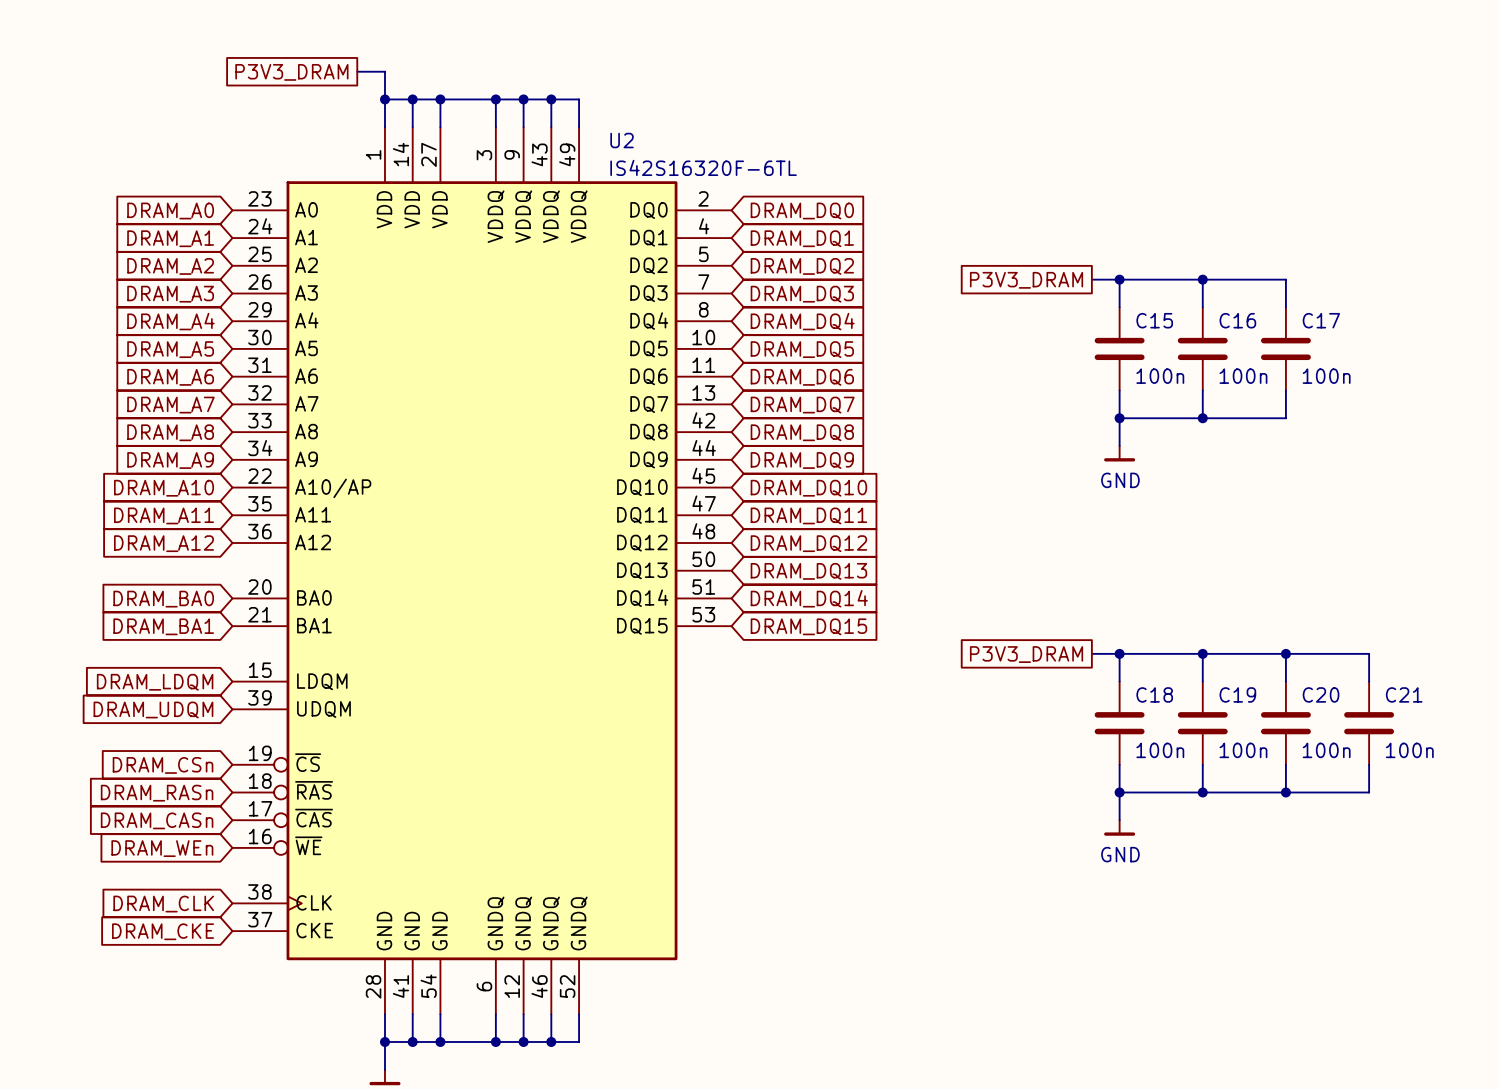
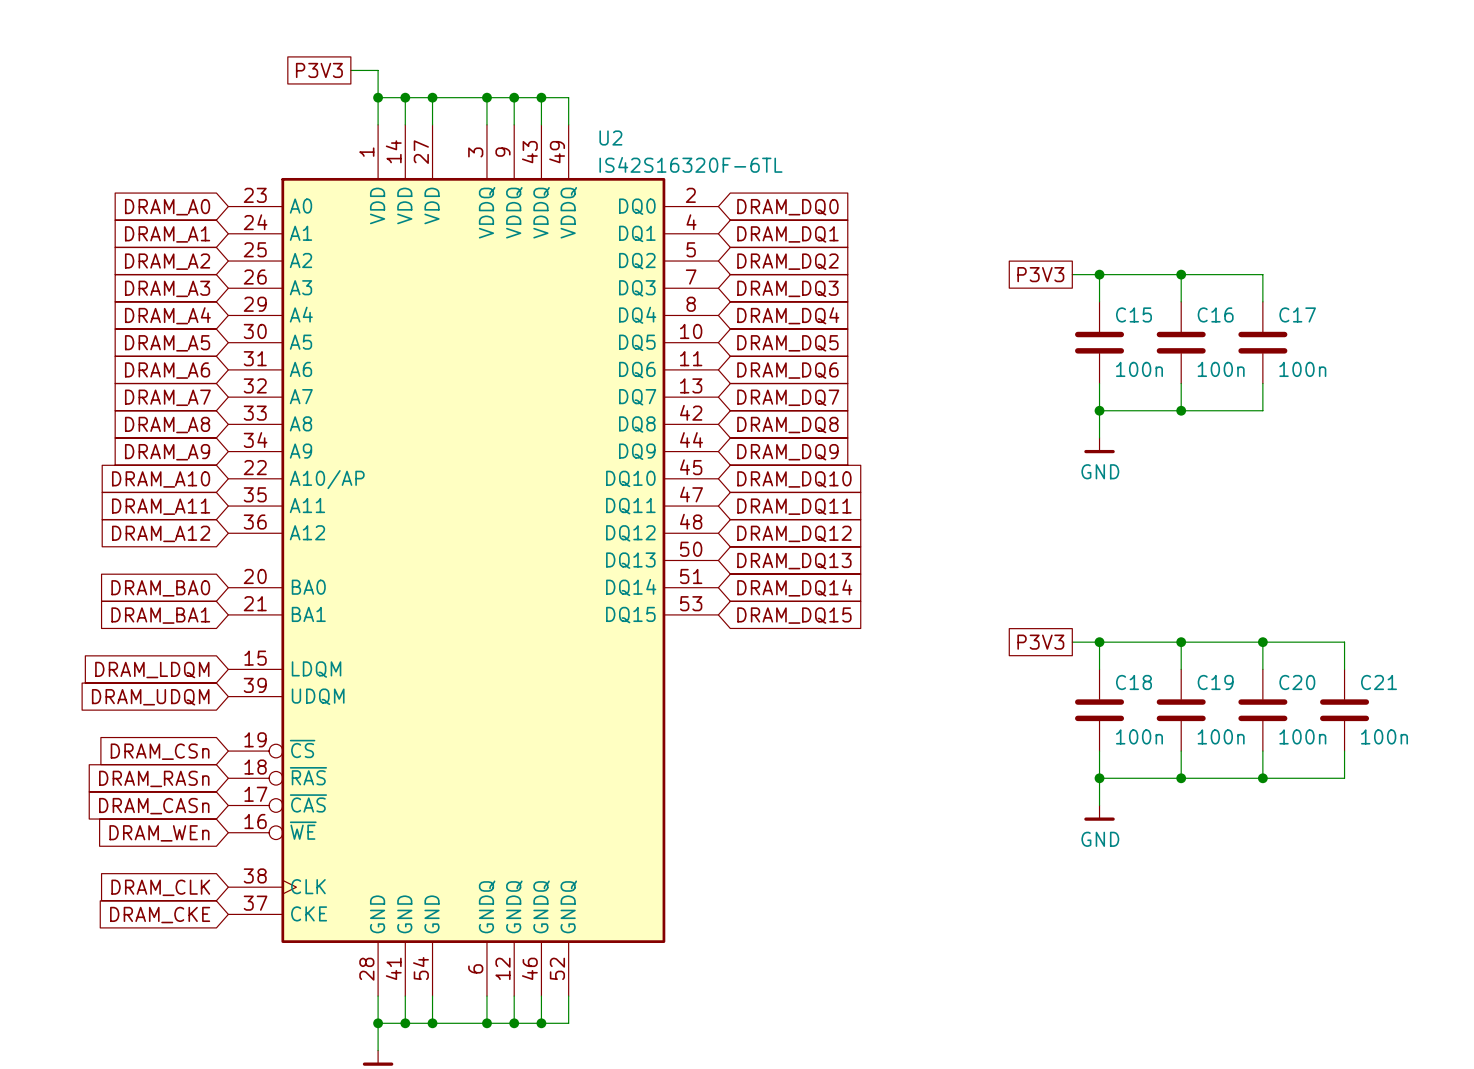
global label: P3V3_DRAM (291, 72) -> P3V3 (319, 70)
global label: P3V3_DRAM (1026, 280) -> P3V3 (1040, 274)
global label: P3V3_DRAM (1026, 654) -> P3V3 (1040, 642)

